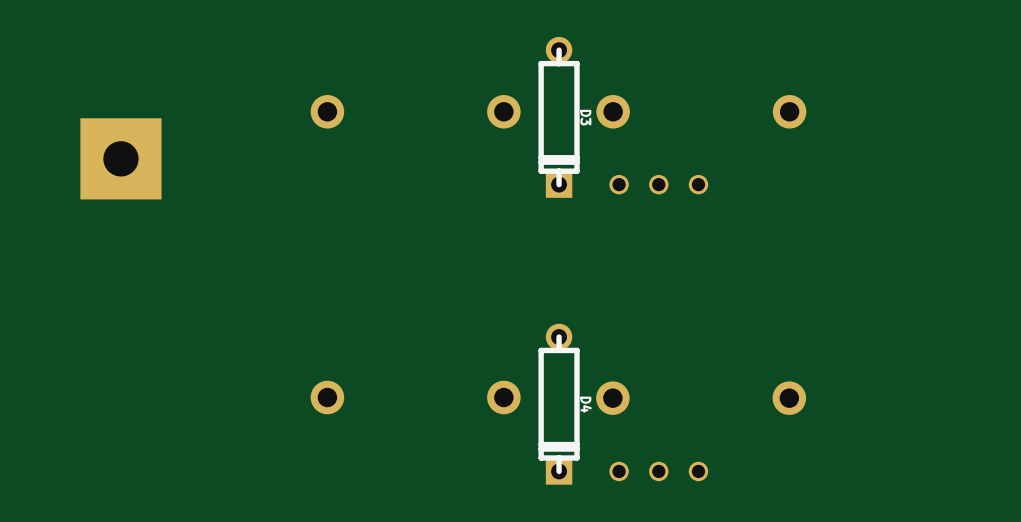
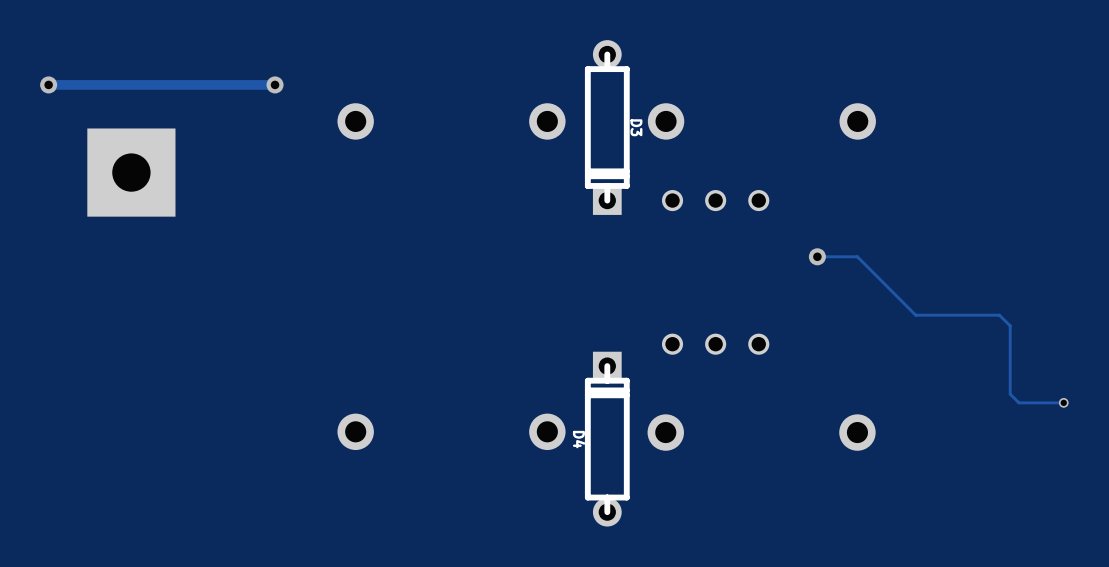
via: none -> (48, 84)
track: none -> (275, 84) (48, 84)
via: none -> (275, 84)
track: none -> (817, 256) (857, 256) (915, 315) (999, 315) (1010, 325) (1010, 394) (1018, 402) (1063, 402)
via: none -> (817, 256)
via: none -> (1063, 402)
D4 rotation: 0° (559, 404) -> 180° (607, 439)
part position: (658, 471) -> (715, 344)

